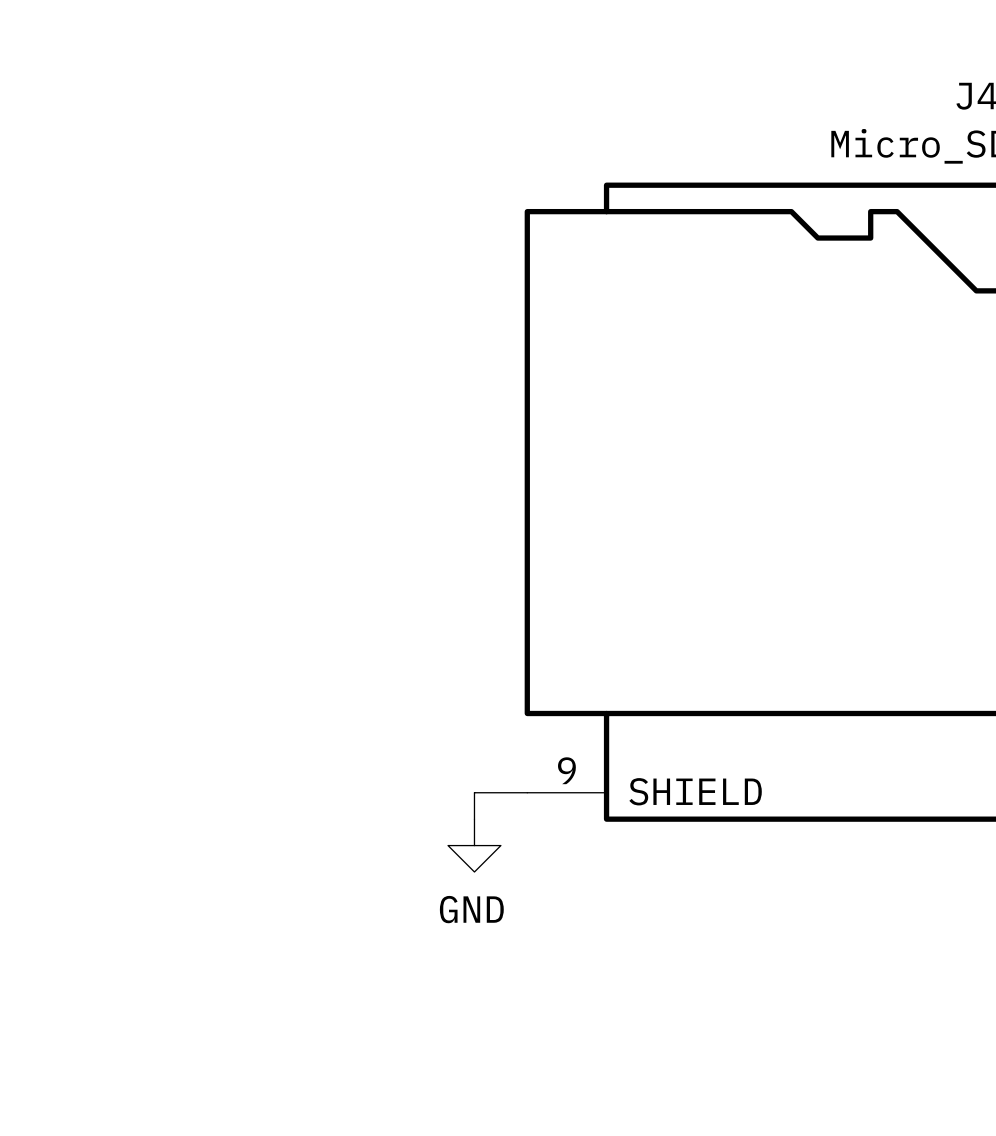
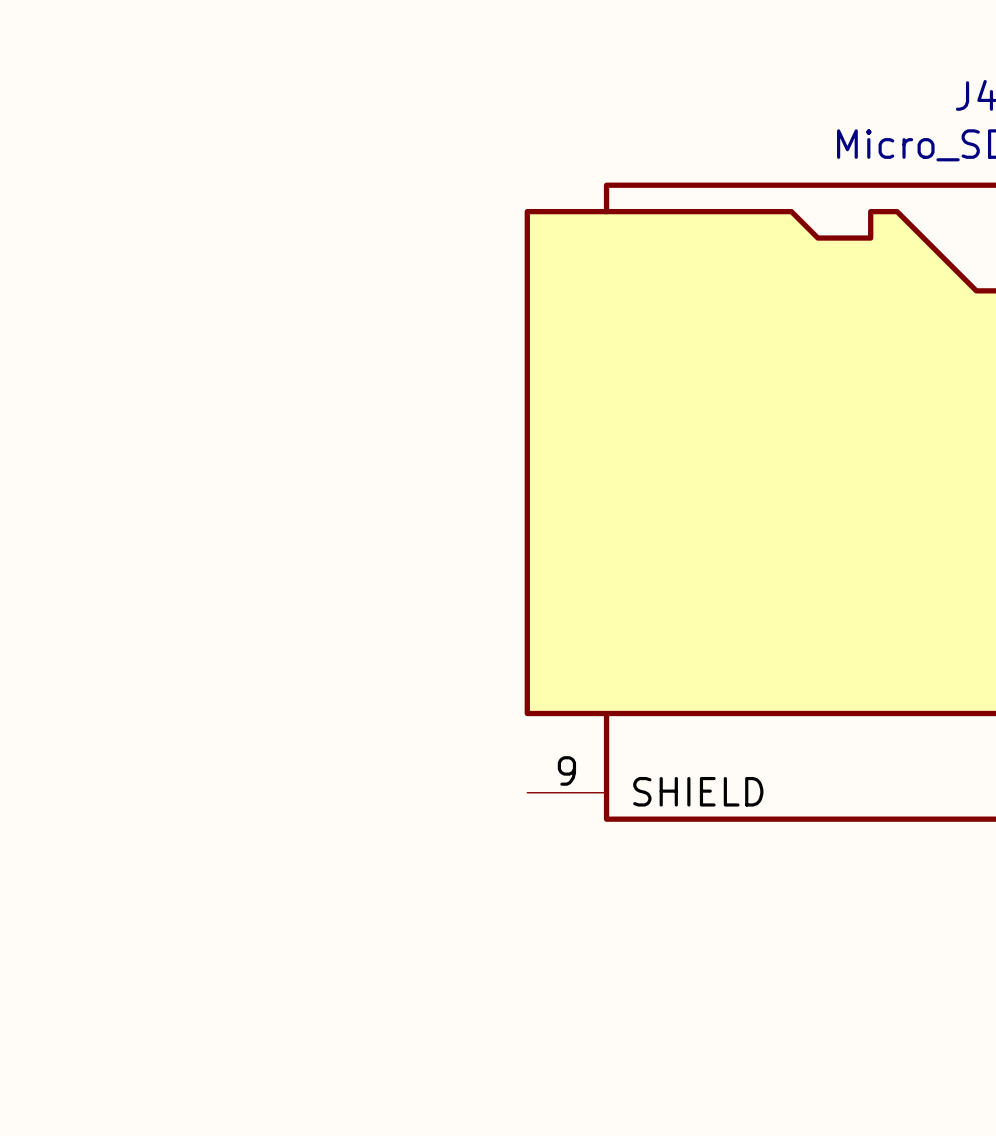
wire: (527, 792) (474, 792) (474, 819) -> none
power symbol: GND (474, 845) -> none

